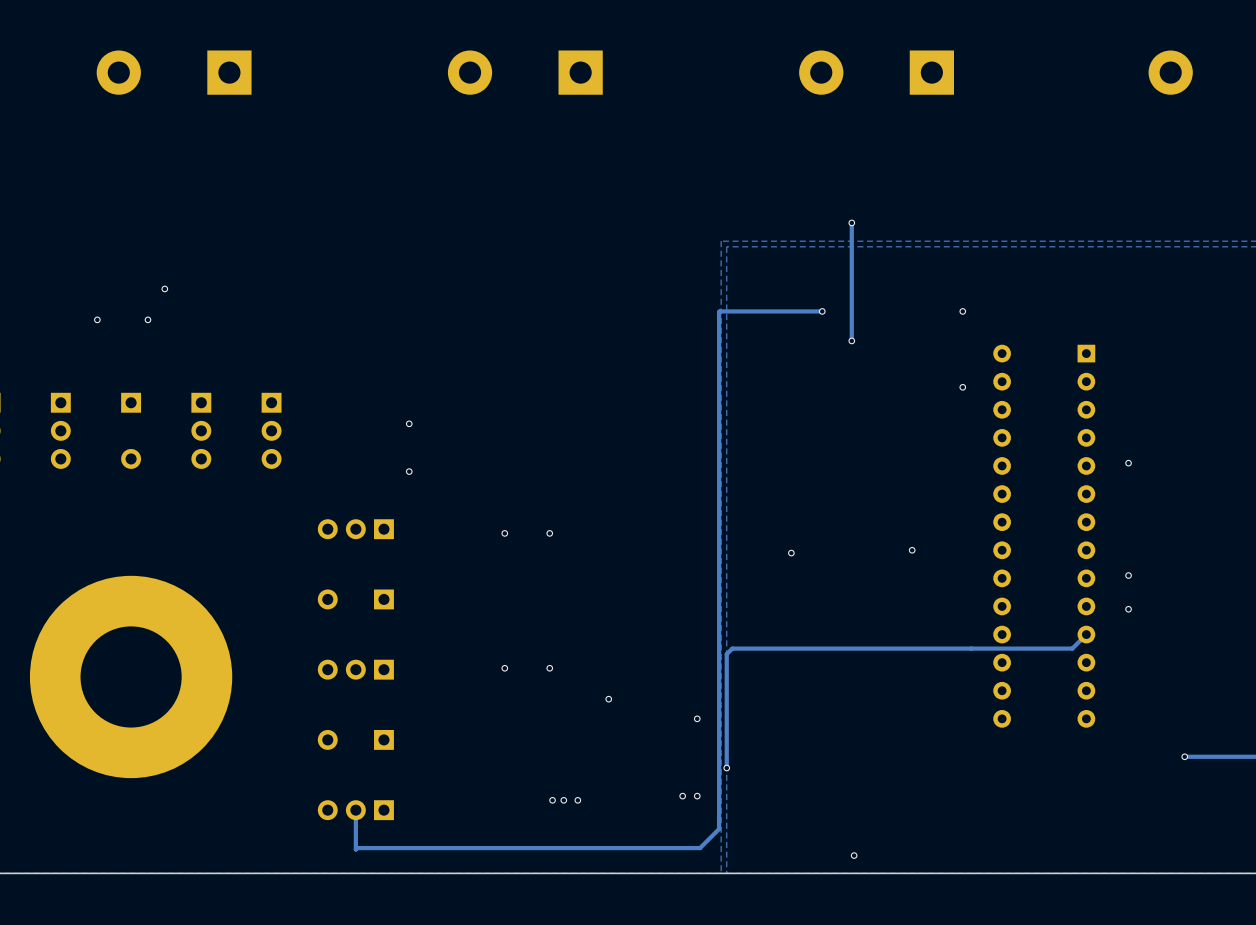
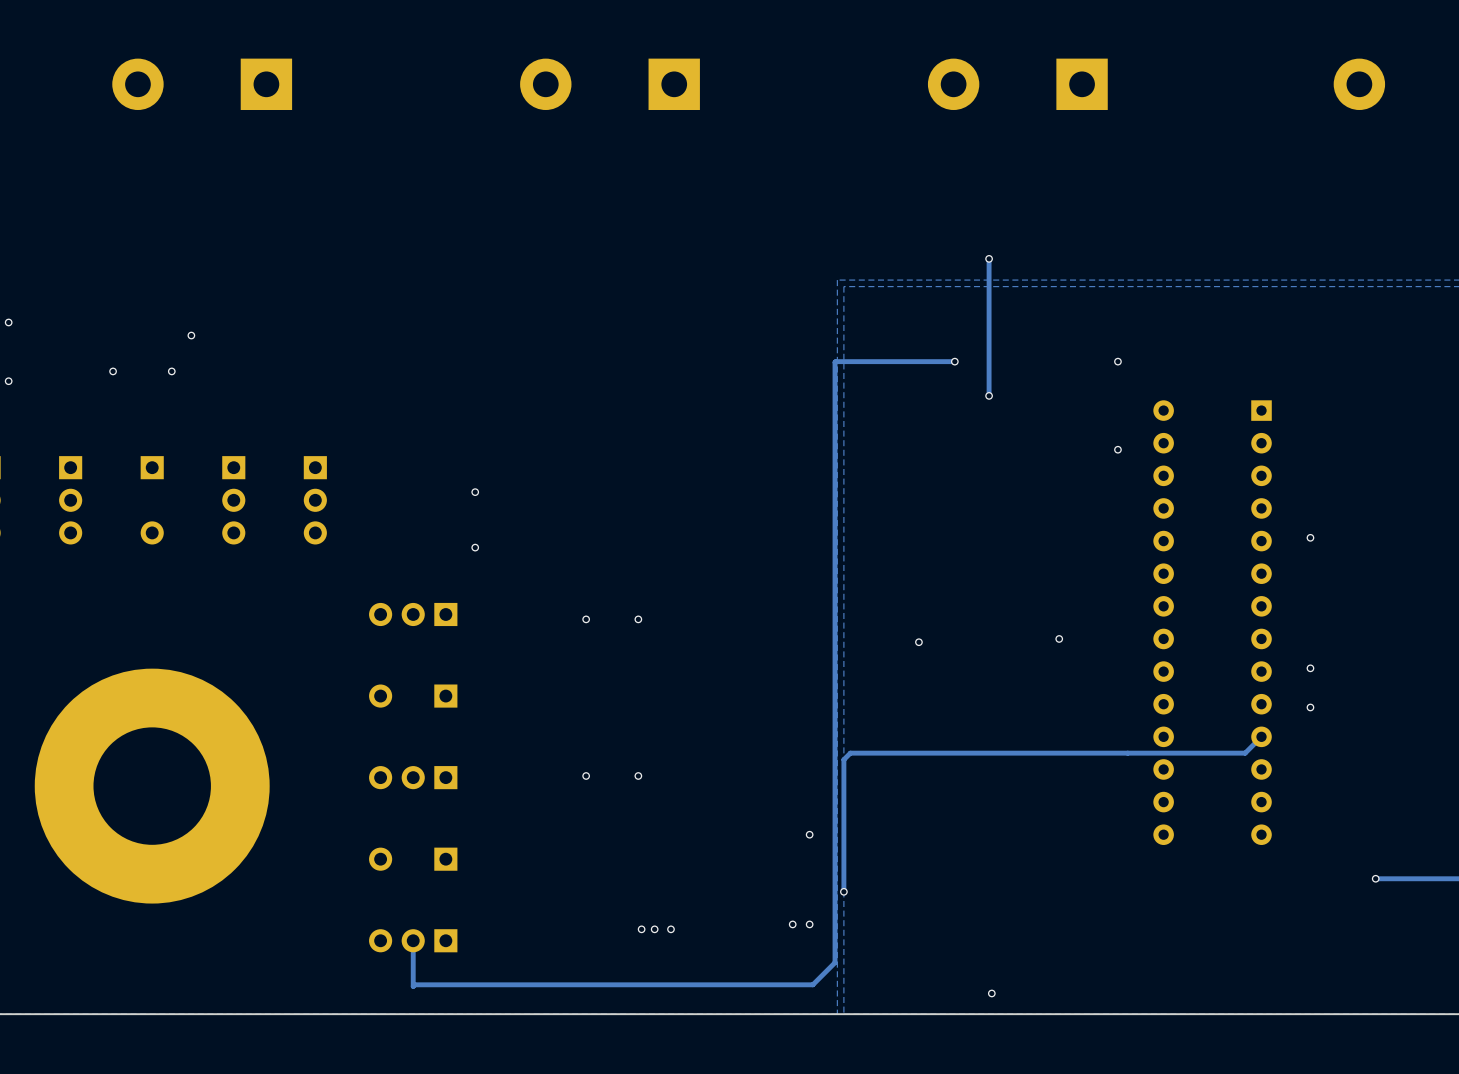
via: none -> (8, 322)
via: none -> (8, 381)
via: (608, 699) -> none

